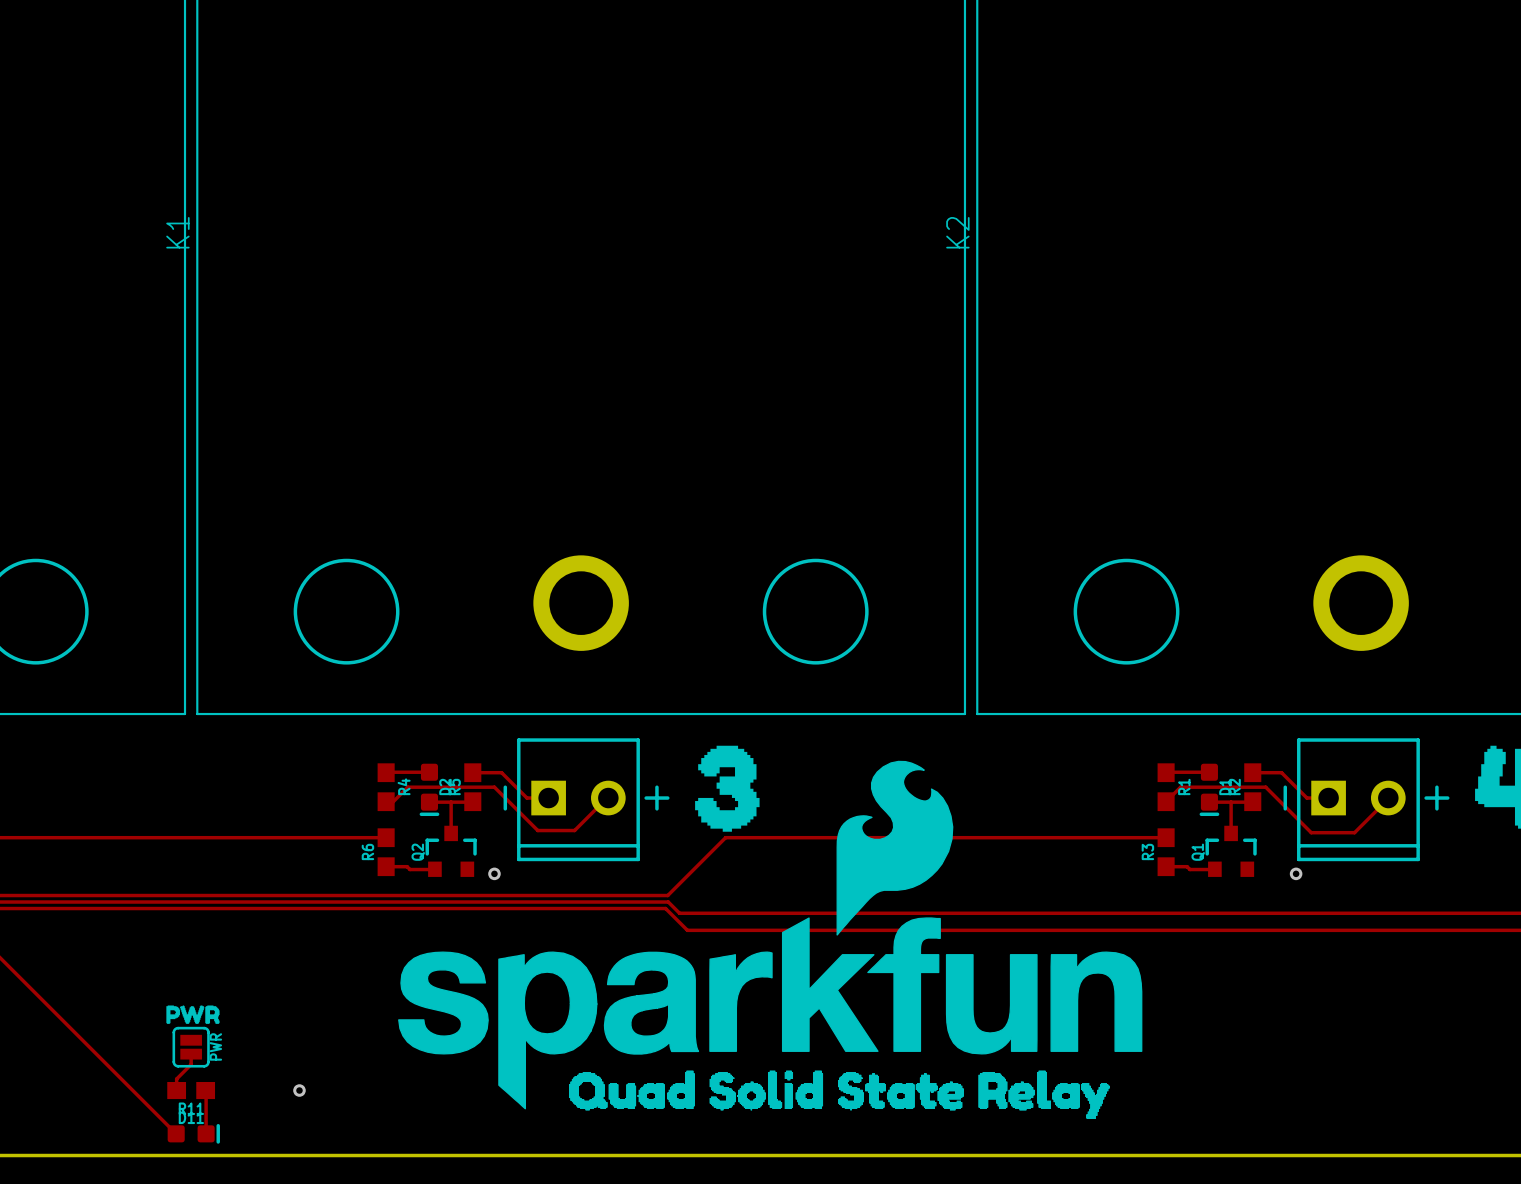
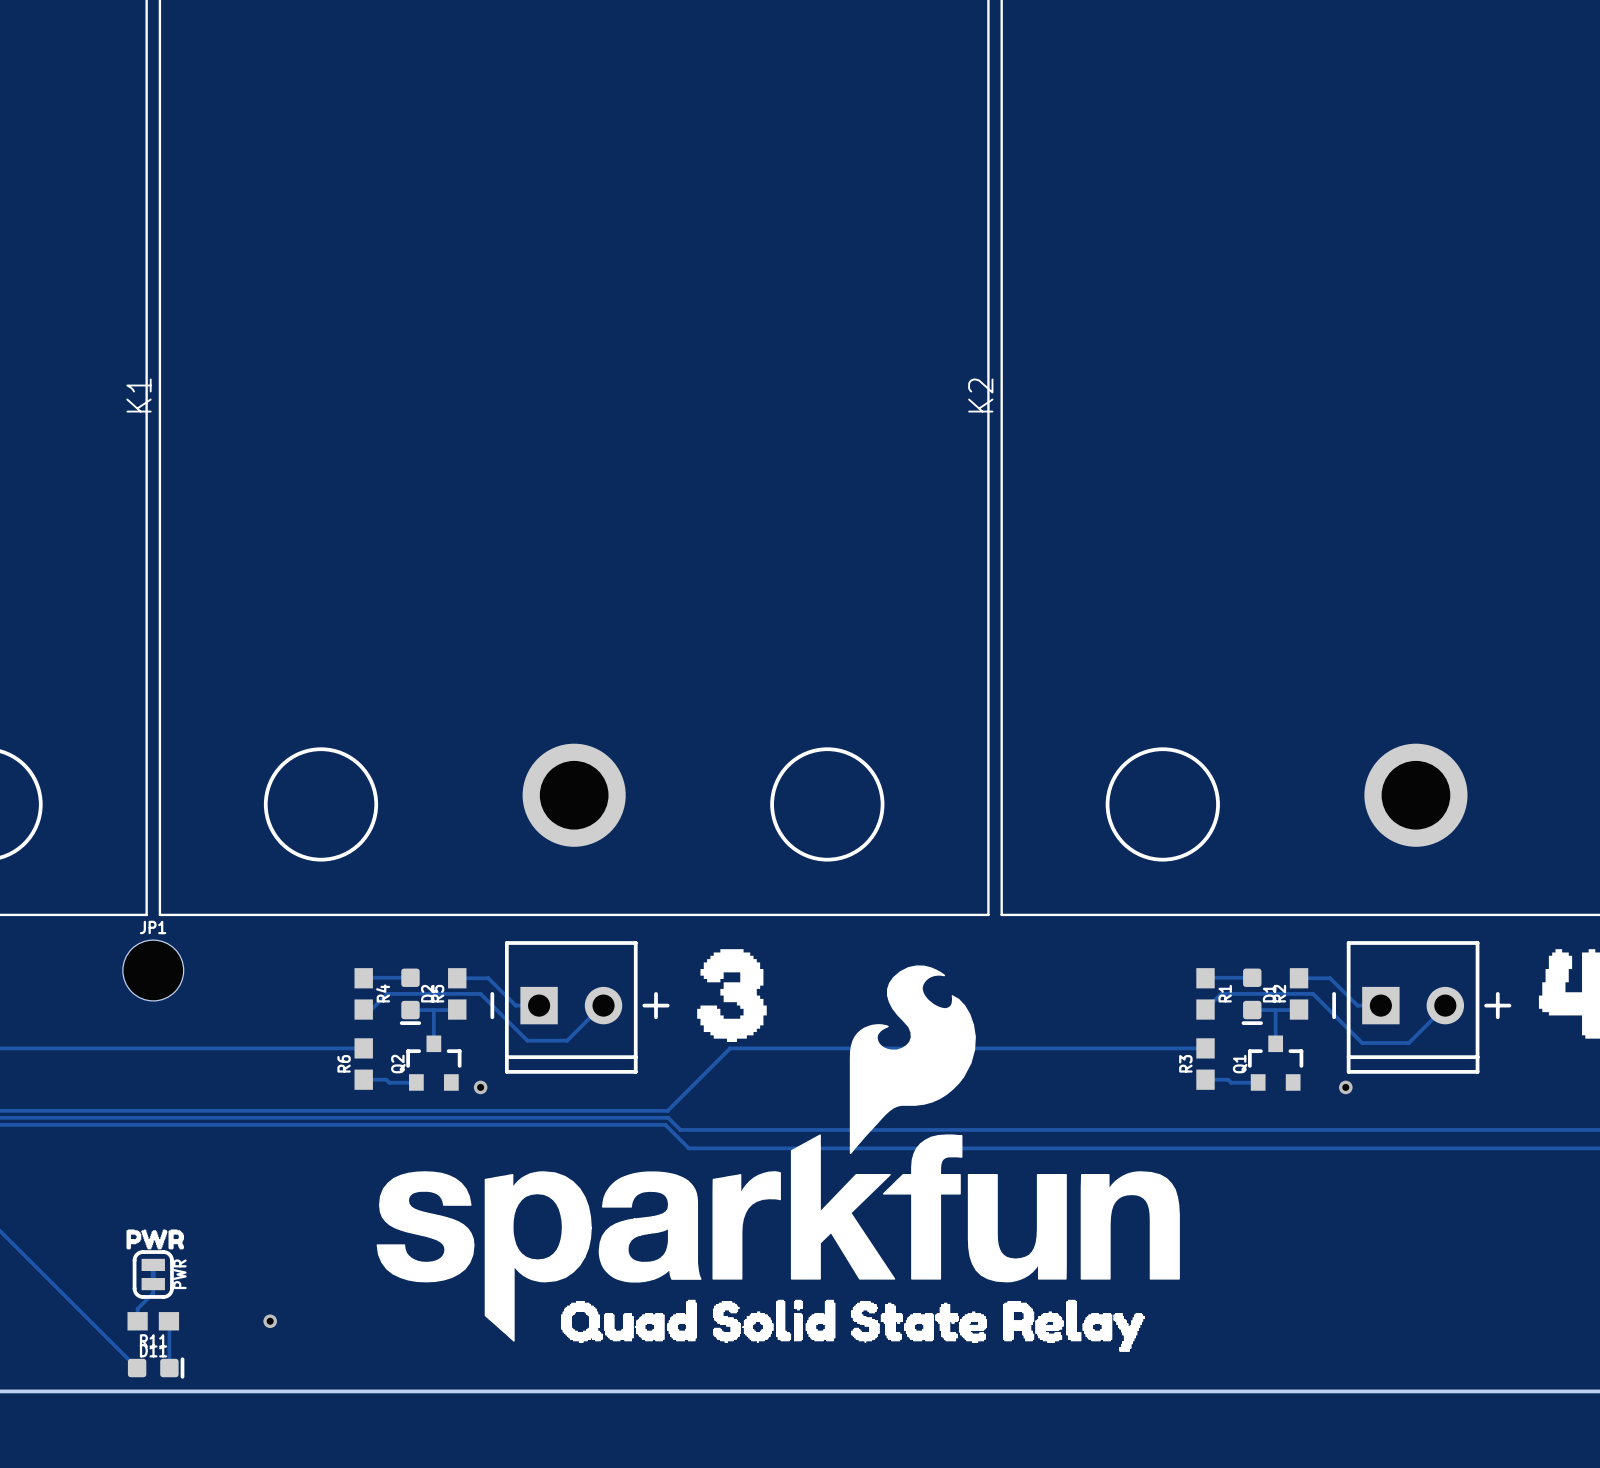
JP1: none -> (153, 970)
PWR footprint: [172, 1026, 210, 1068] -> [132, 1250, 174, 1299]

